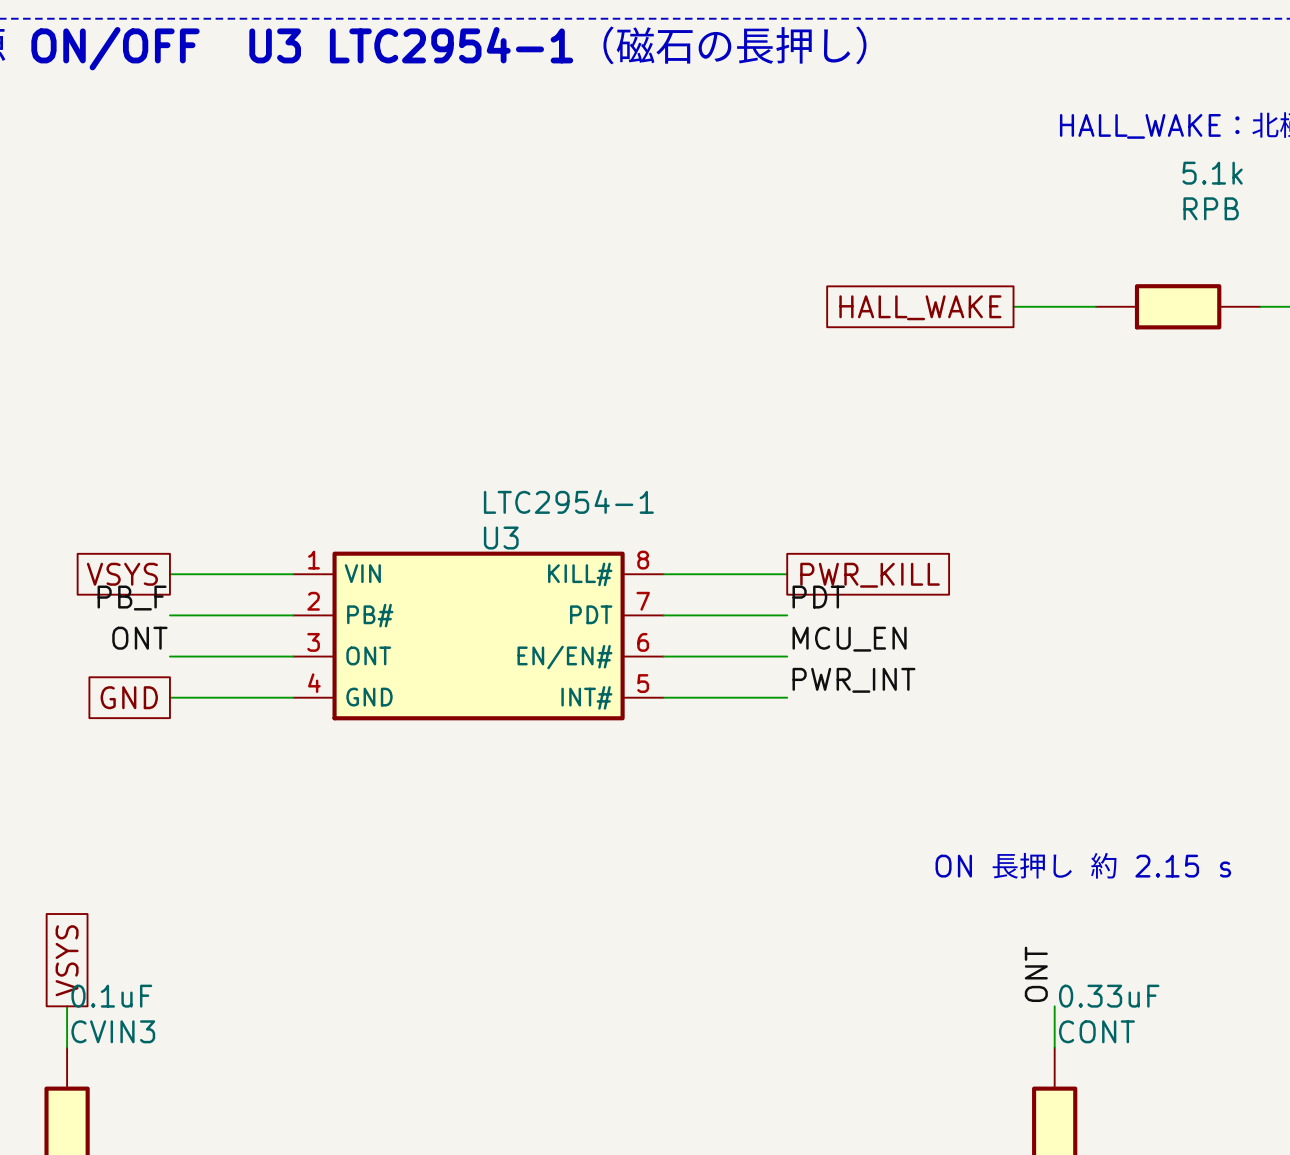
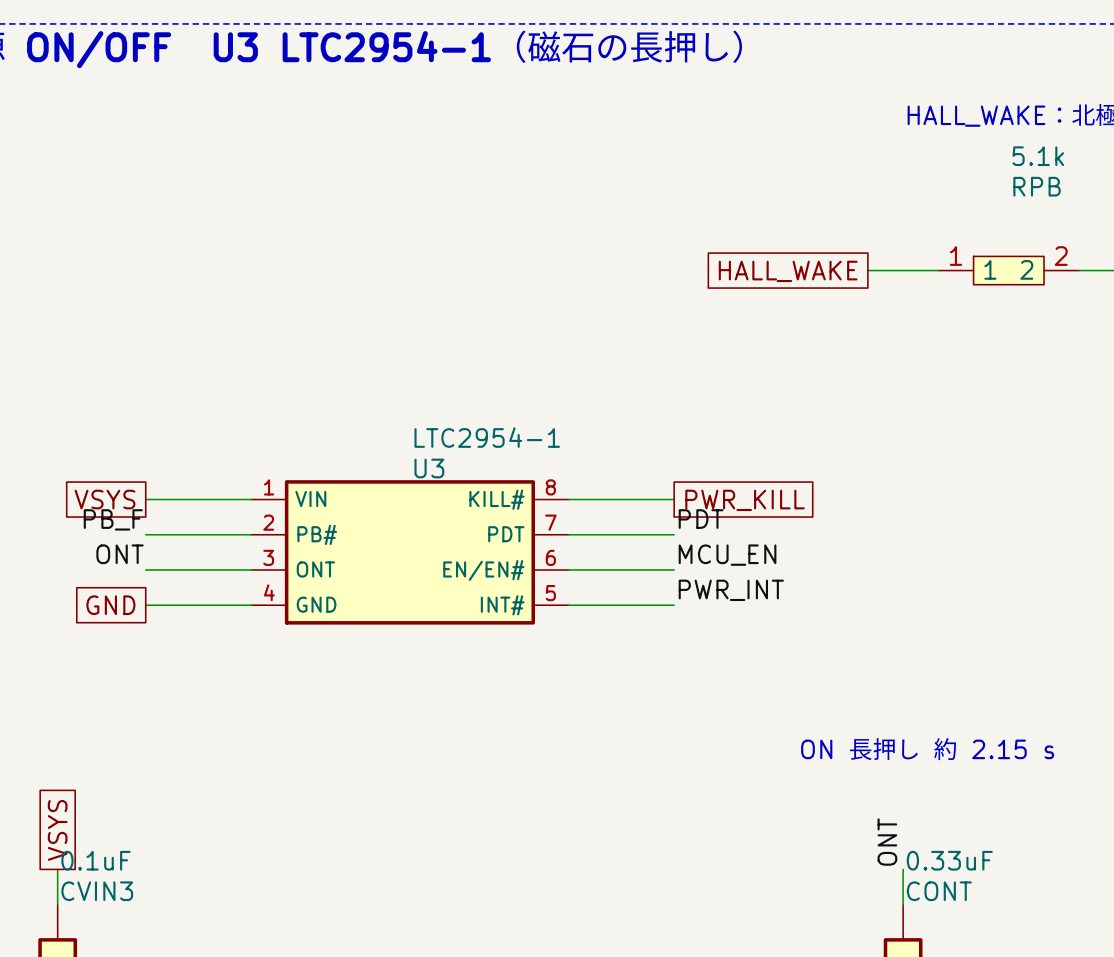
RPB symbol: [1095, 284, 1261, 330] -> [938, 256, 1080, 285]

